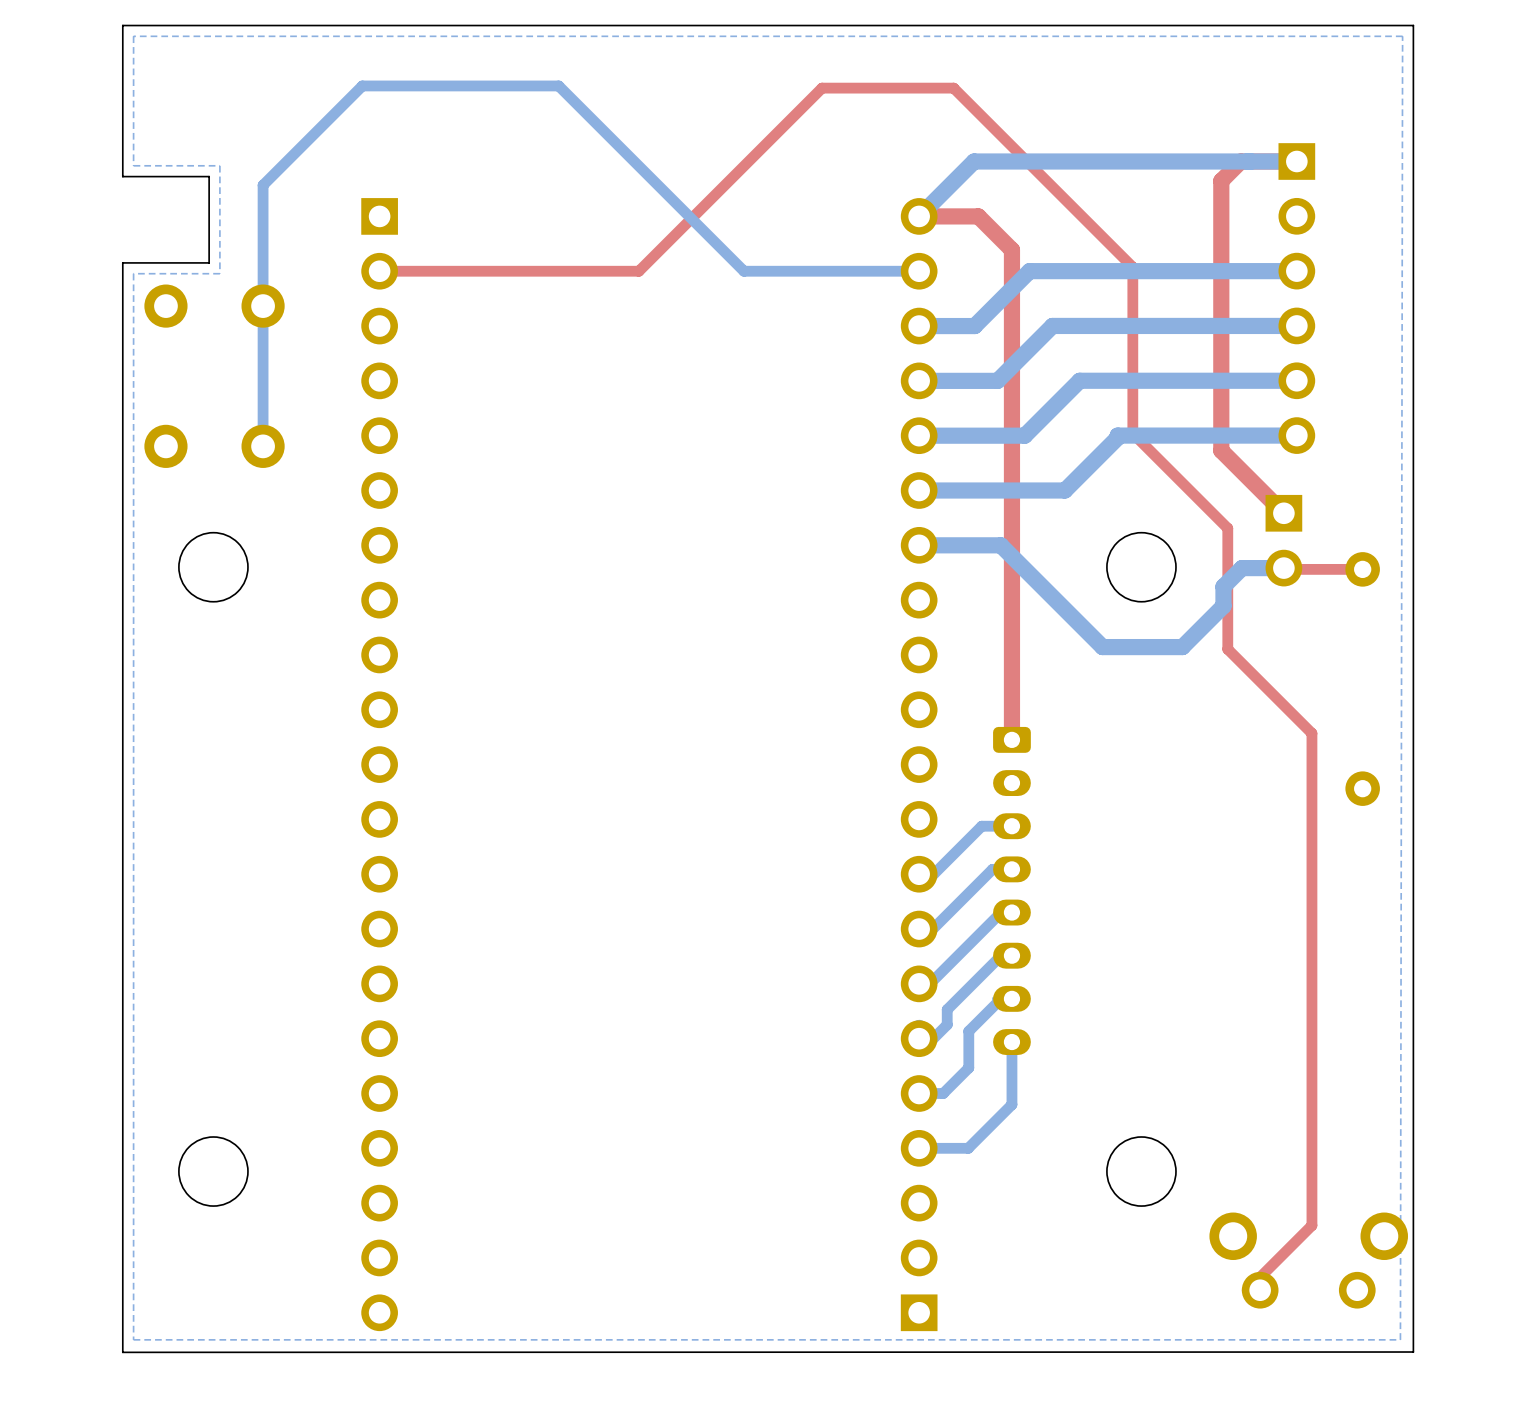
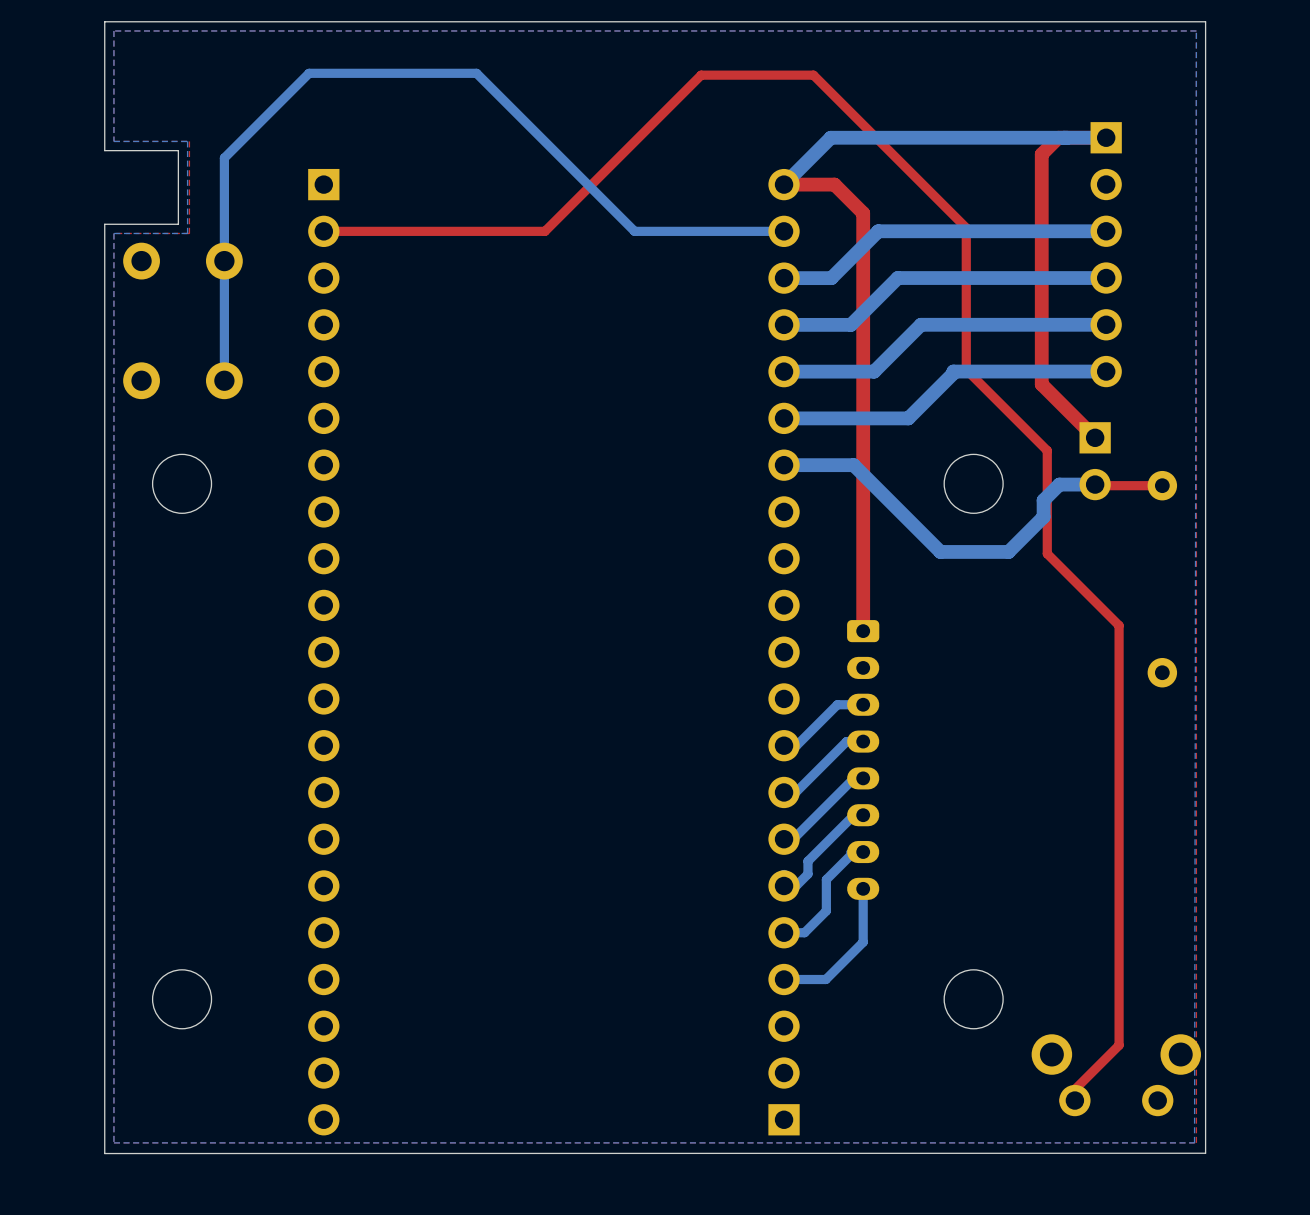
top zone outline: none -> (1196, 30) (1196, 1142) (113, 1142) (113, 233) (189, 233) (189, 141) (113, 141) (113, 30) (1196, 30)

